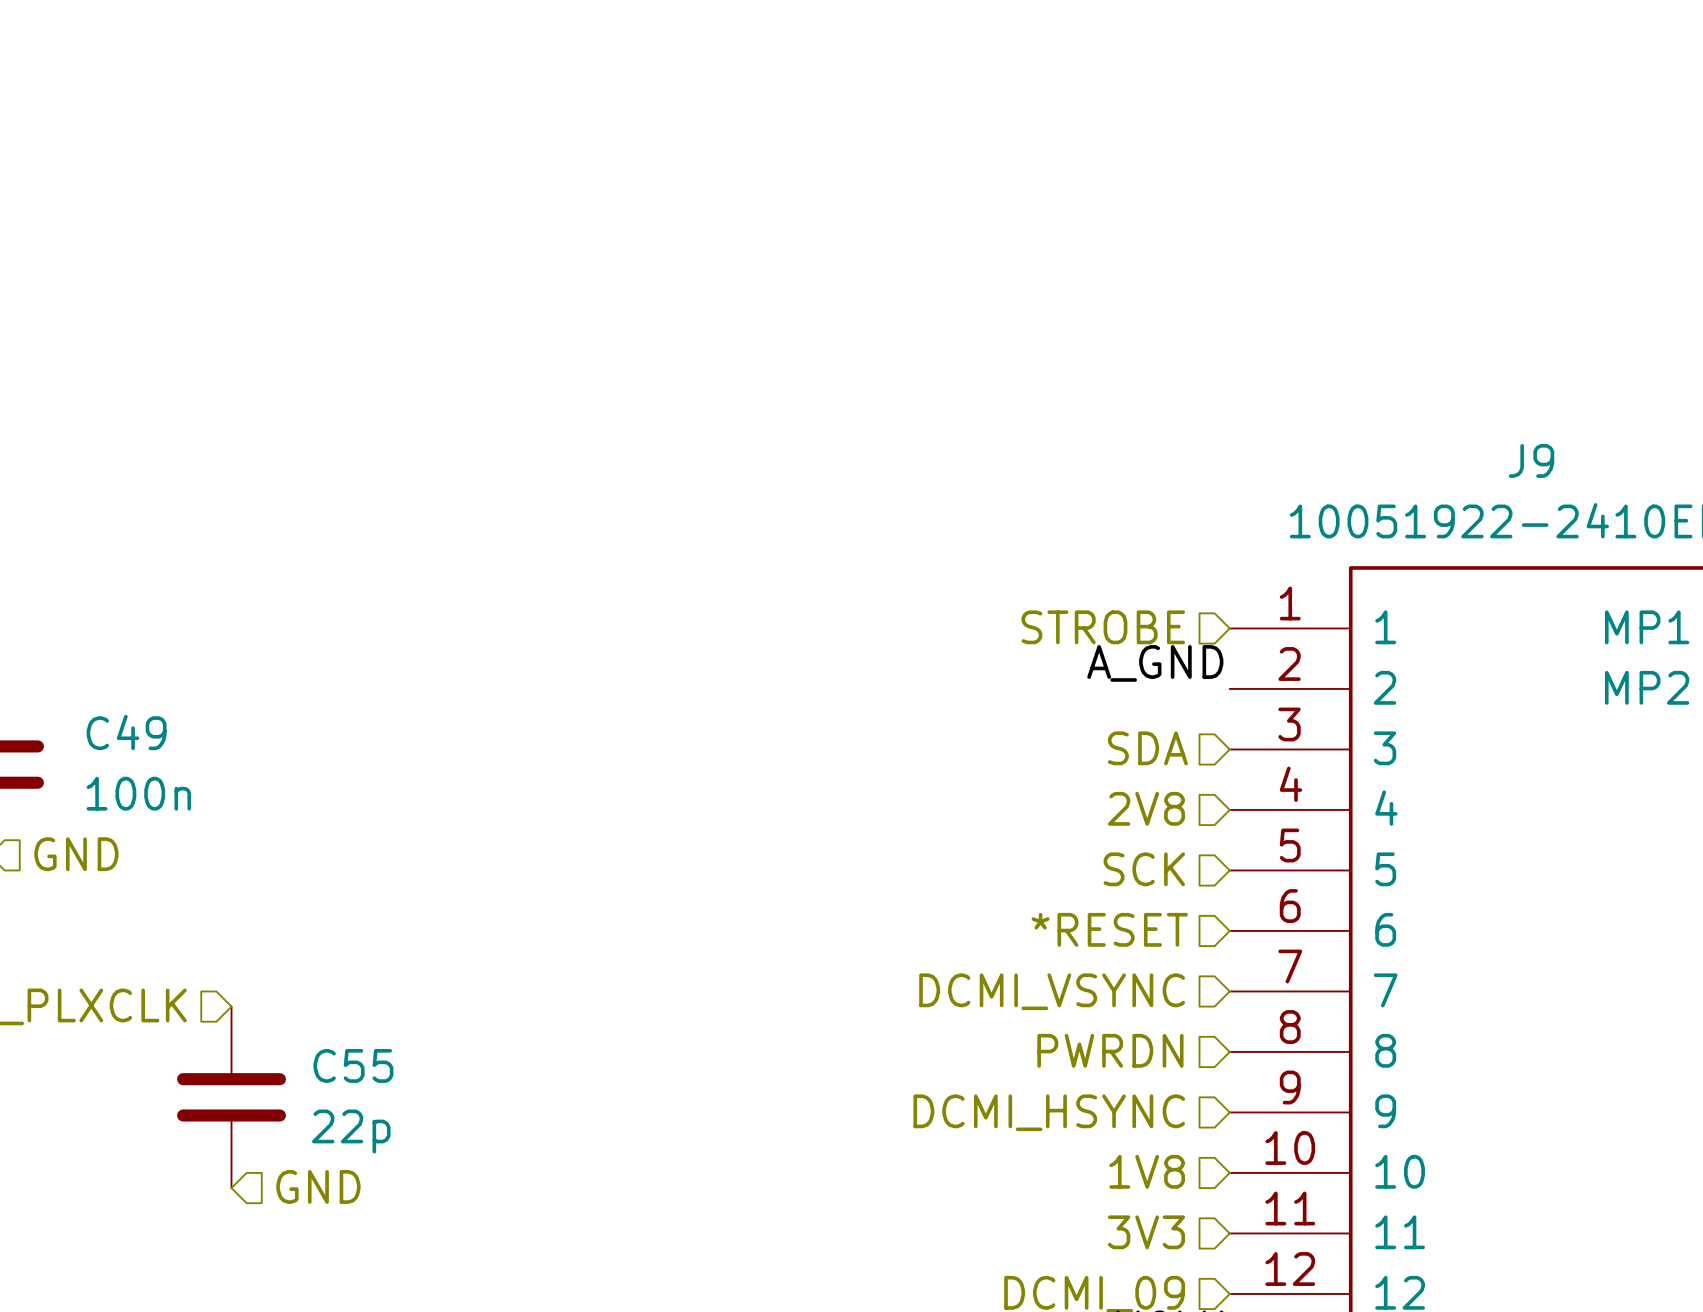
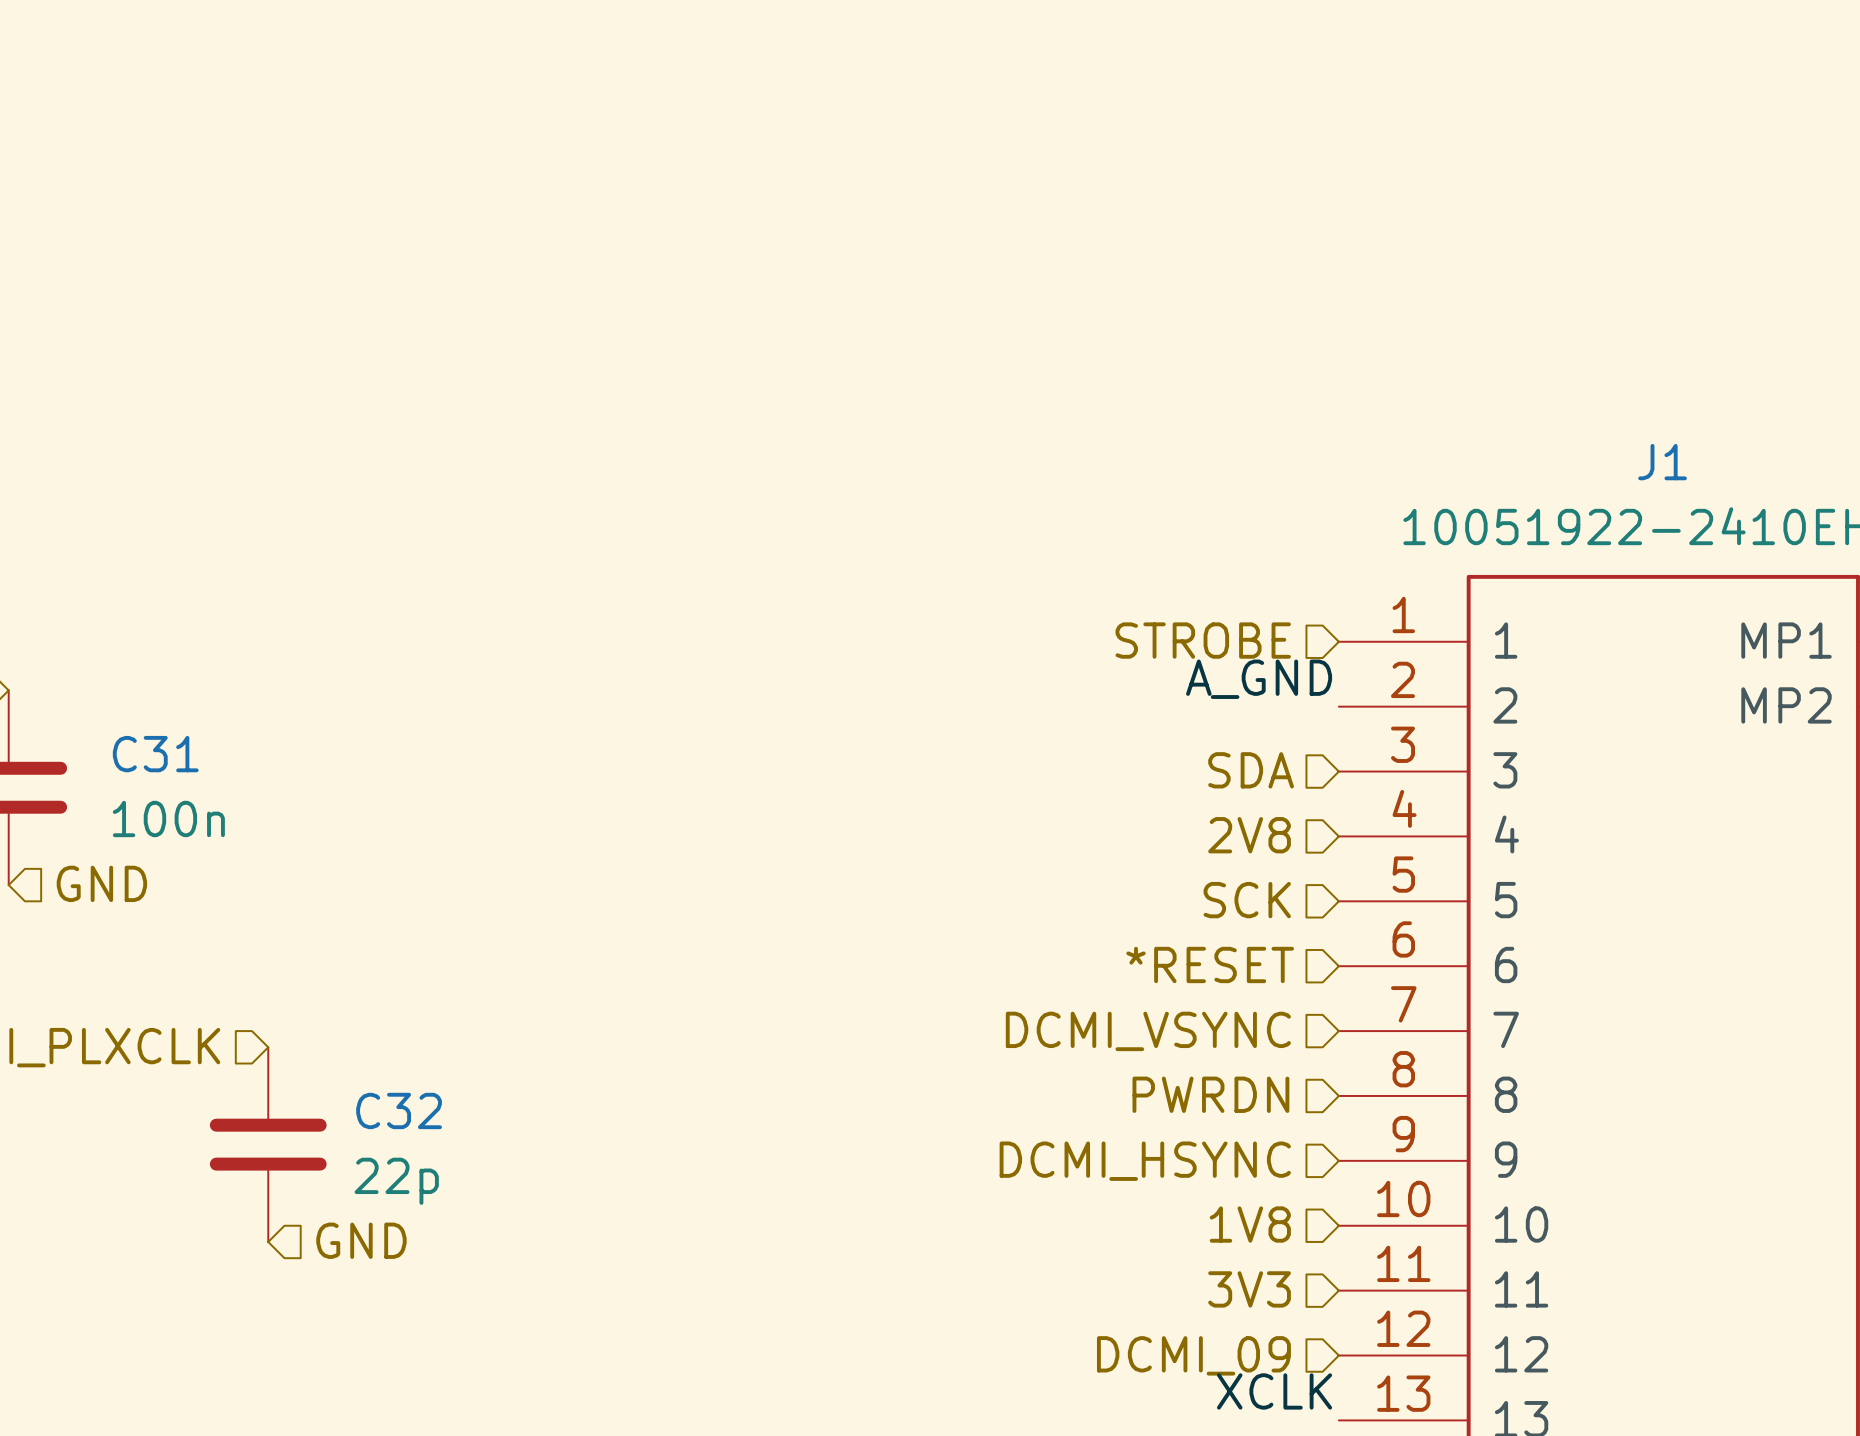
J9 name: J9 (1531, 460) -> J1 (1662, 462)
C49 name: C49 (126, 732) -> C31 (155, 754)
C55 name: C55 (353, 1065) -> C32 (399, 1110)

